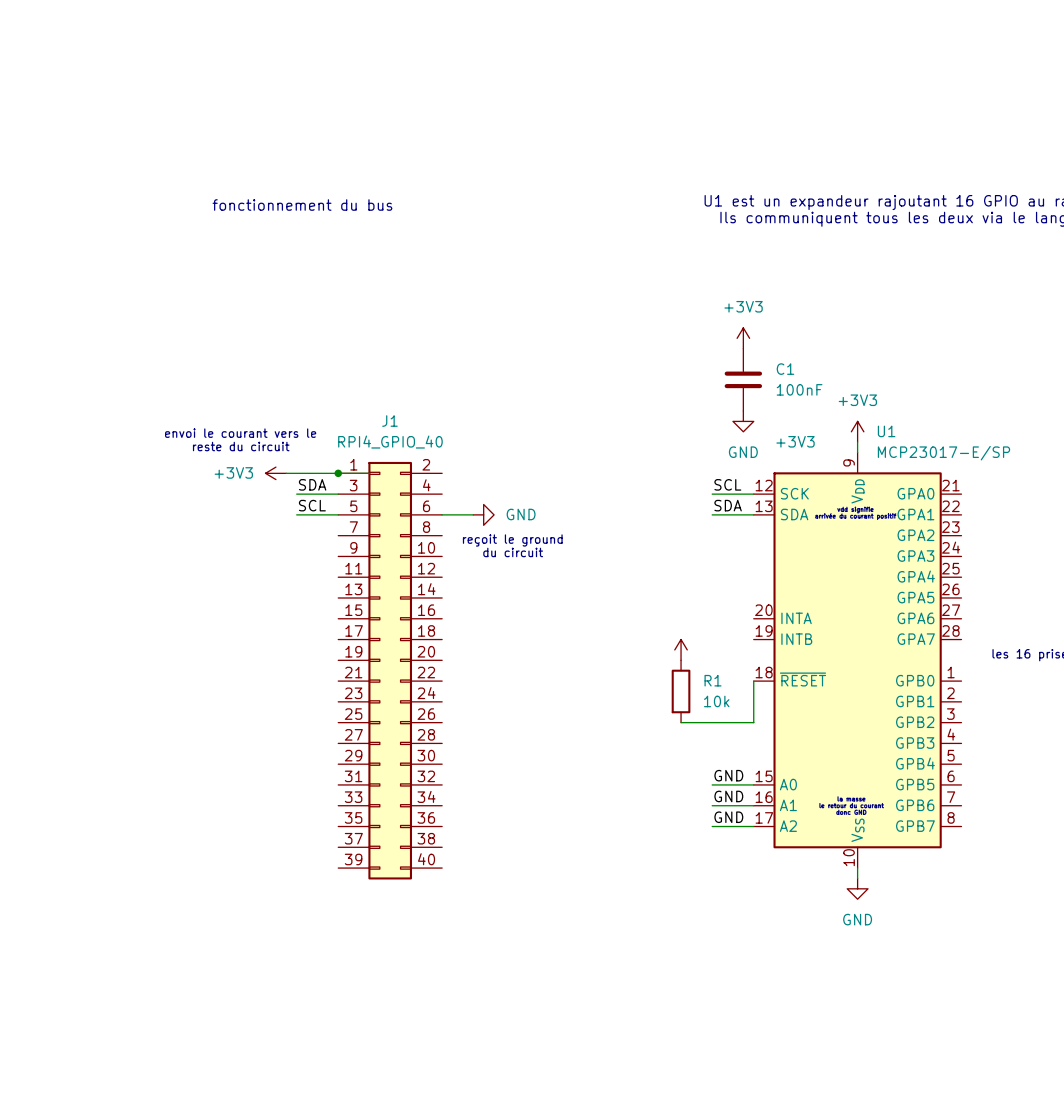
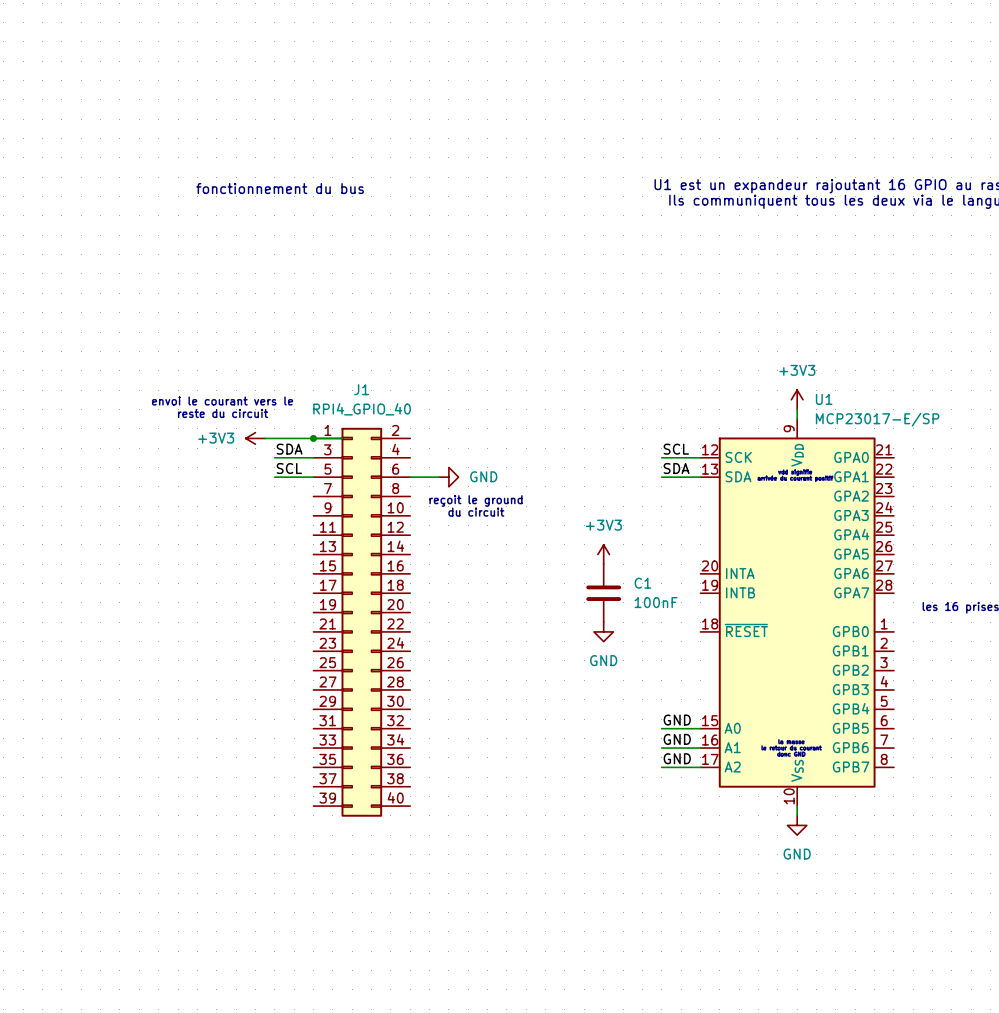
power symbol: +3V3 (743, 338) -> none
C1 position: (743, 379) -> (603, 593)
power symbol: GND (743, 421) -> none
power symbol text position: +3V3 (795, 441) -> +3V3 (603, 525)
power symbol position: +3V3 (681, 649) -> +3V3 (603, 554)
power symbol: none -> GND (603, 631)
wire: (753, 681) (753, 722) (681, 722) -> none
R1: 10k (681, 691) -> none

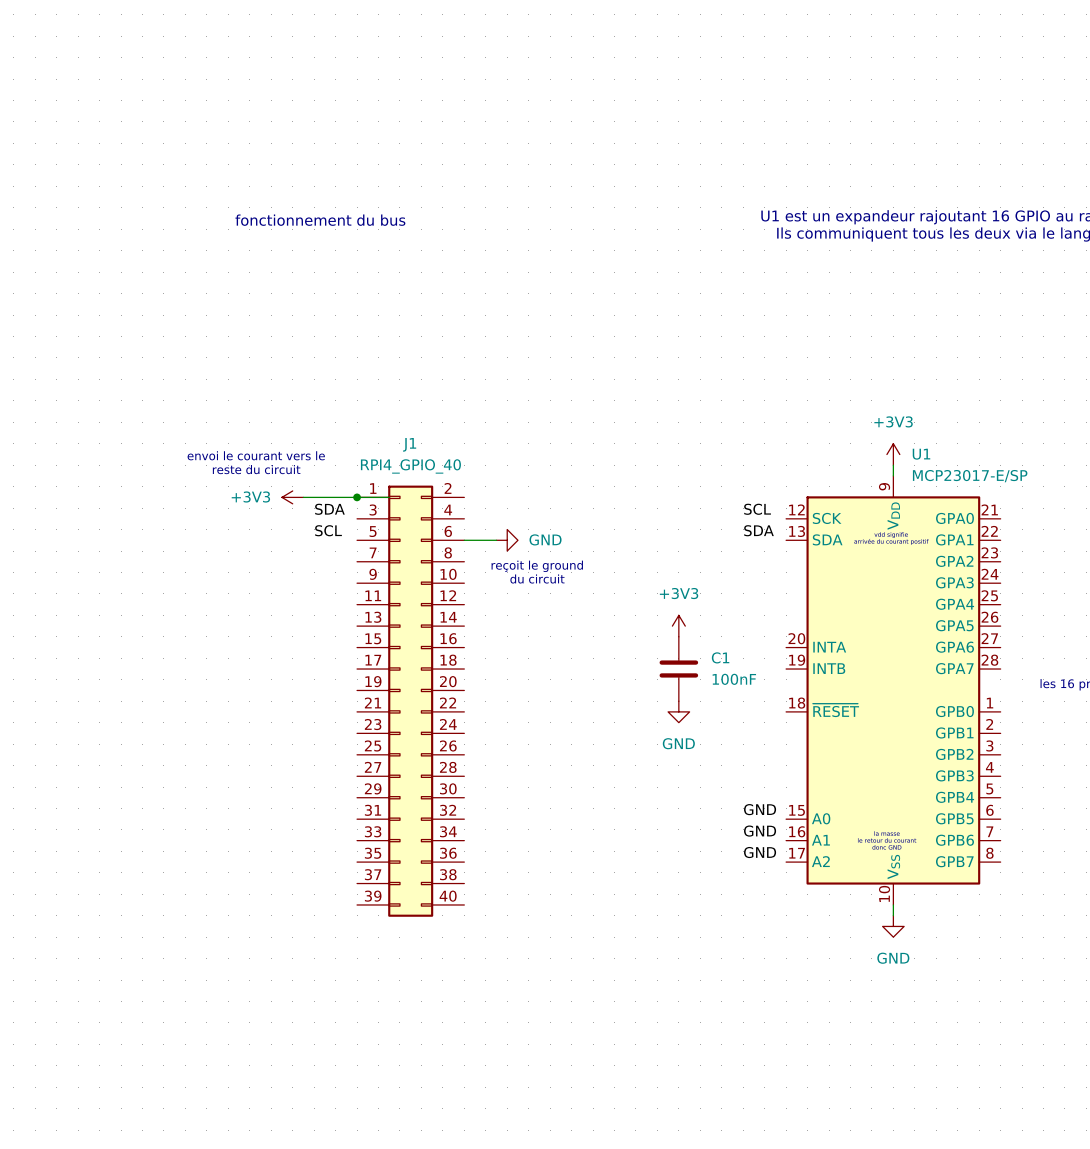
wire: (274, 457) (313, 457) -> none
wire: (661, 457) (700, 457) -> none
wire: (274, 477) (313, 477) -> none
wire: (661, 477) (700, 477) -> none
wire: (661, 728) (700, 728) -> none
wire: (661, 748) (700, 748) -> none
wire: (661, 767) (700, 767) -> none

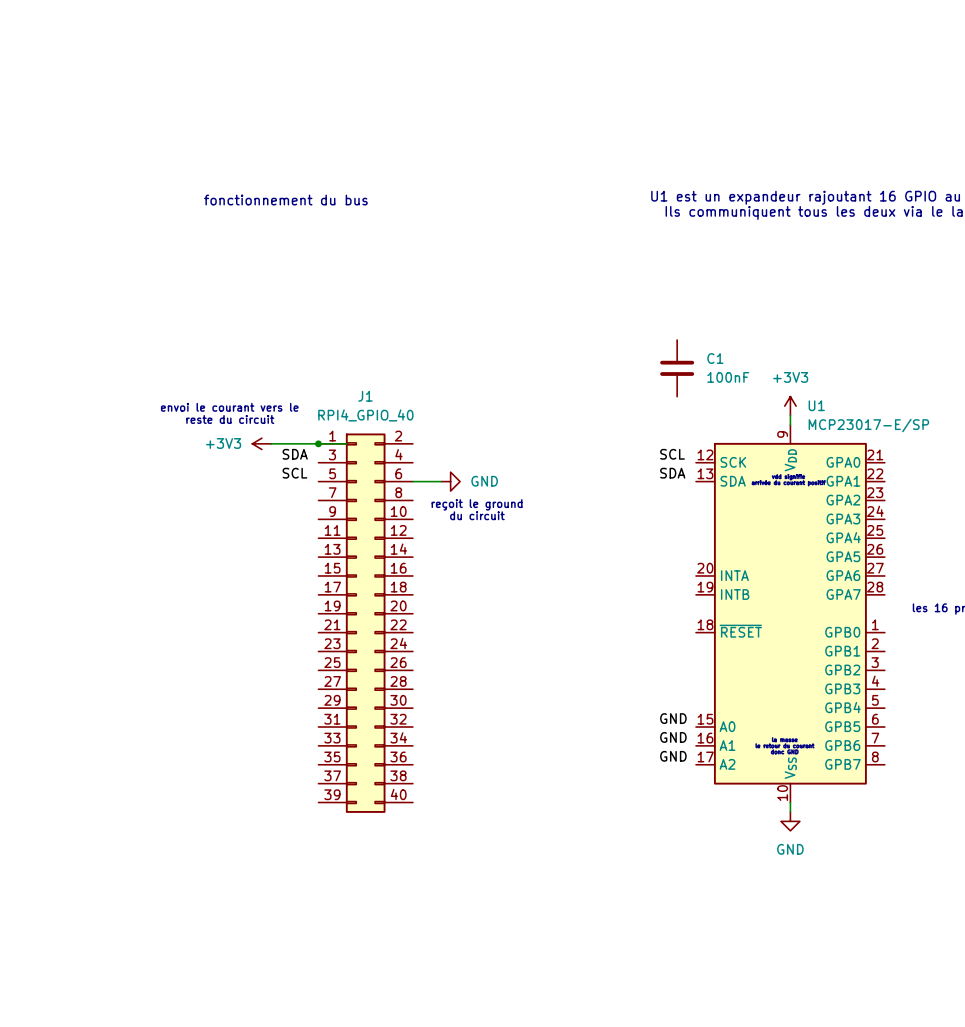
power symbol: +3V3 (678, 626) -> none
C1 position: (678, 669) -> (677, 368)
power symbol: GND (678, 711) -> none

